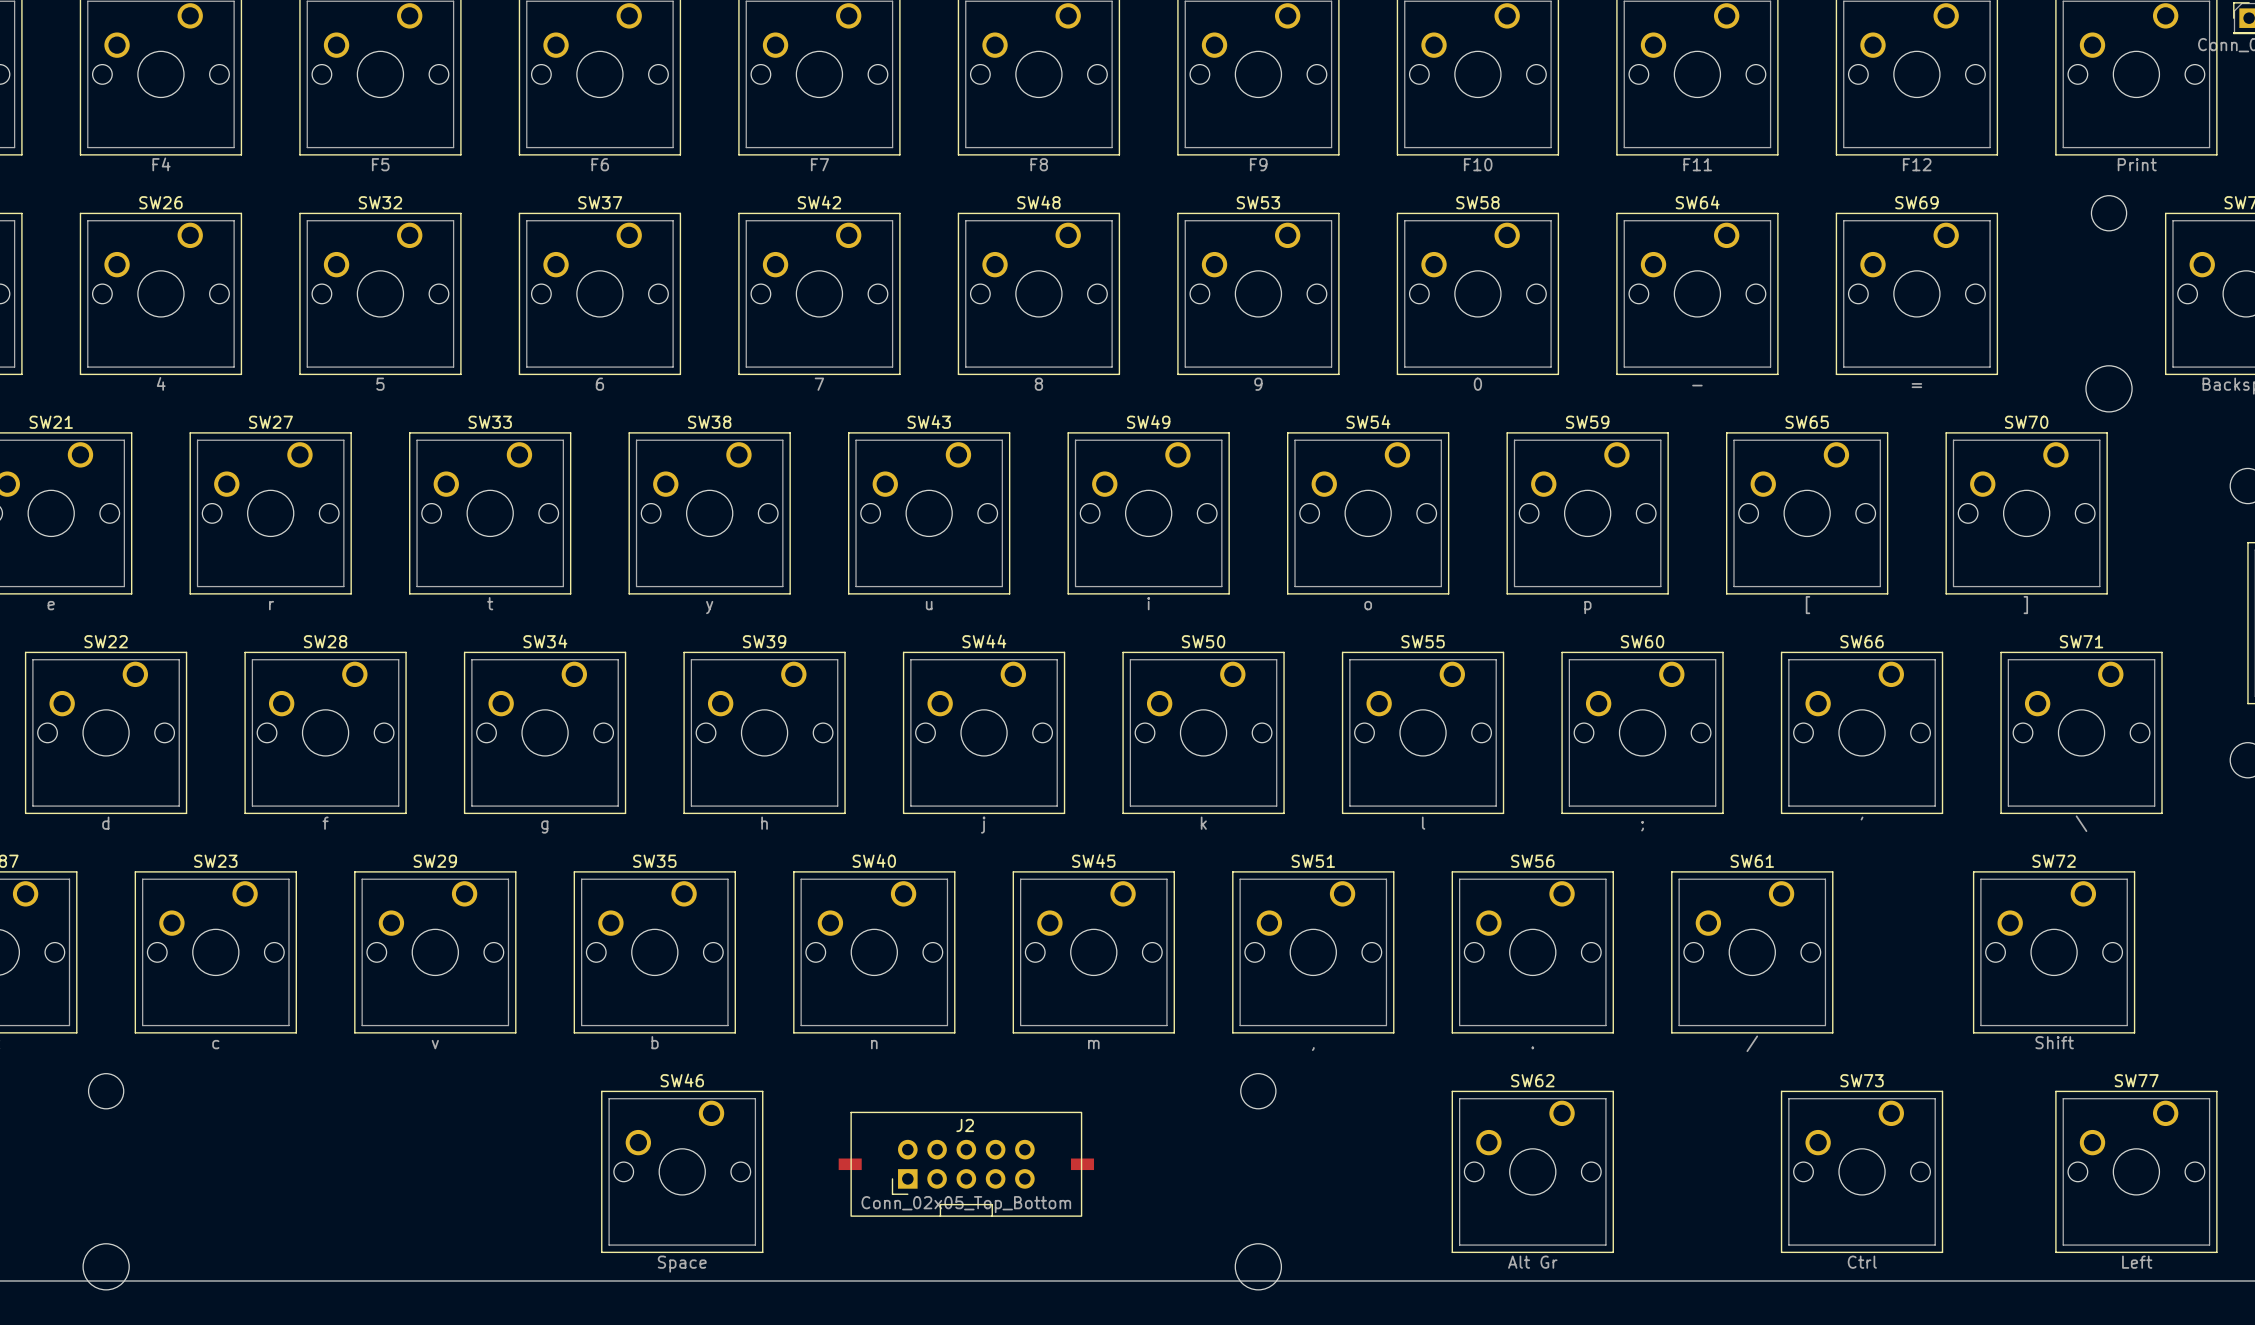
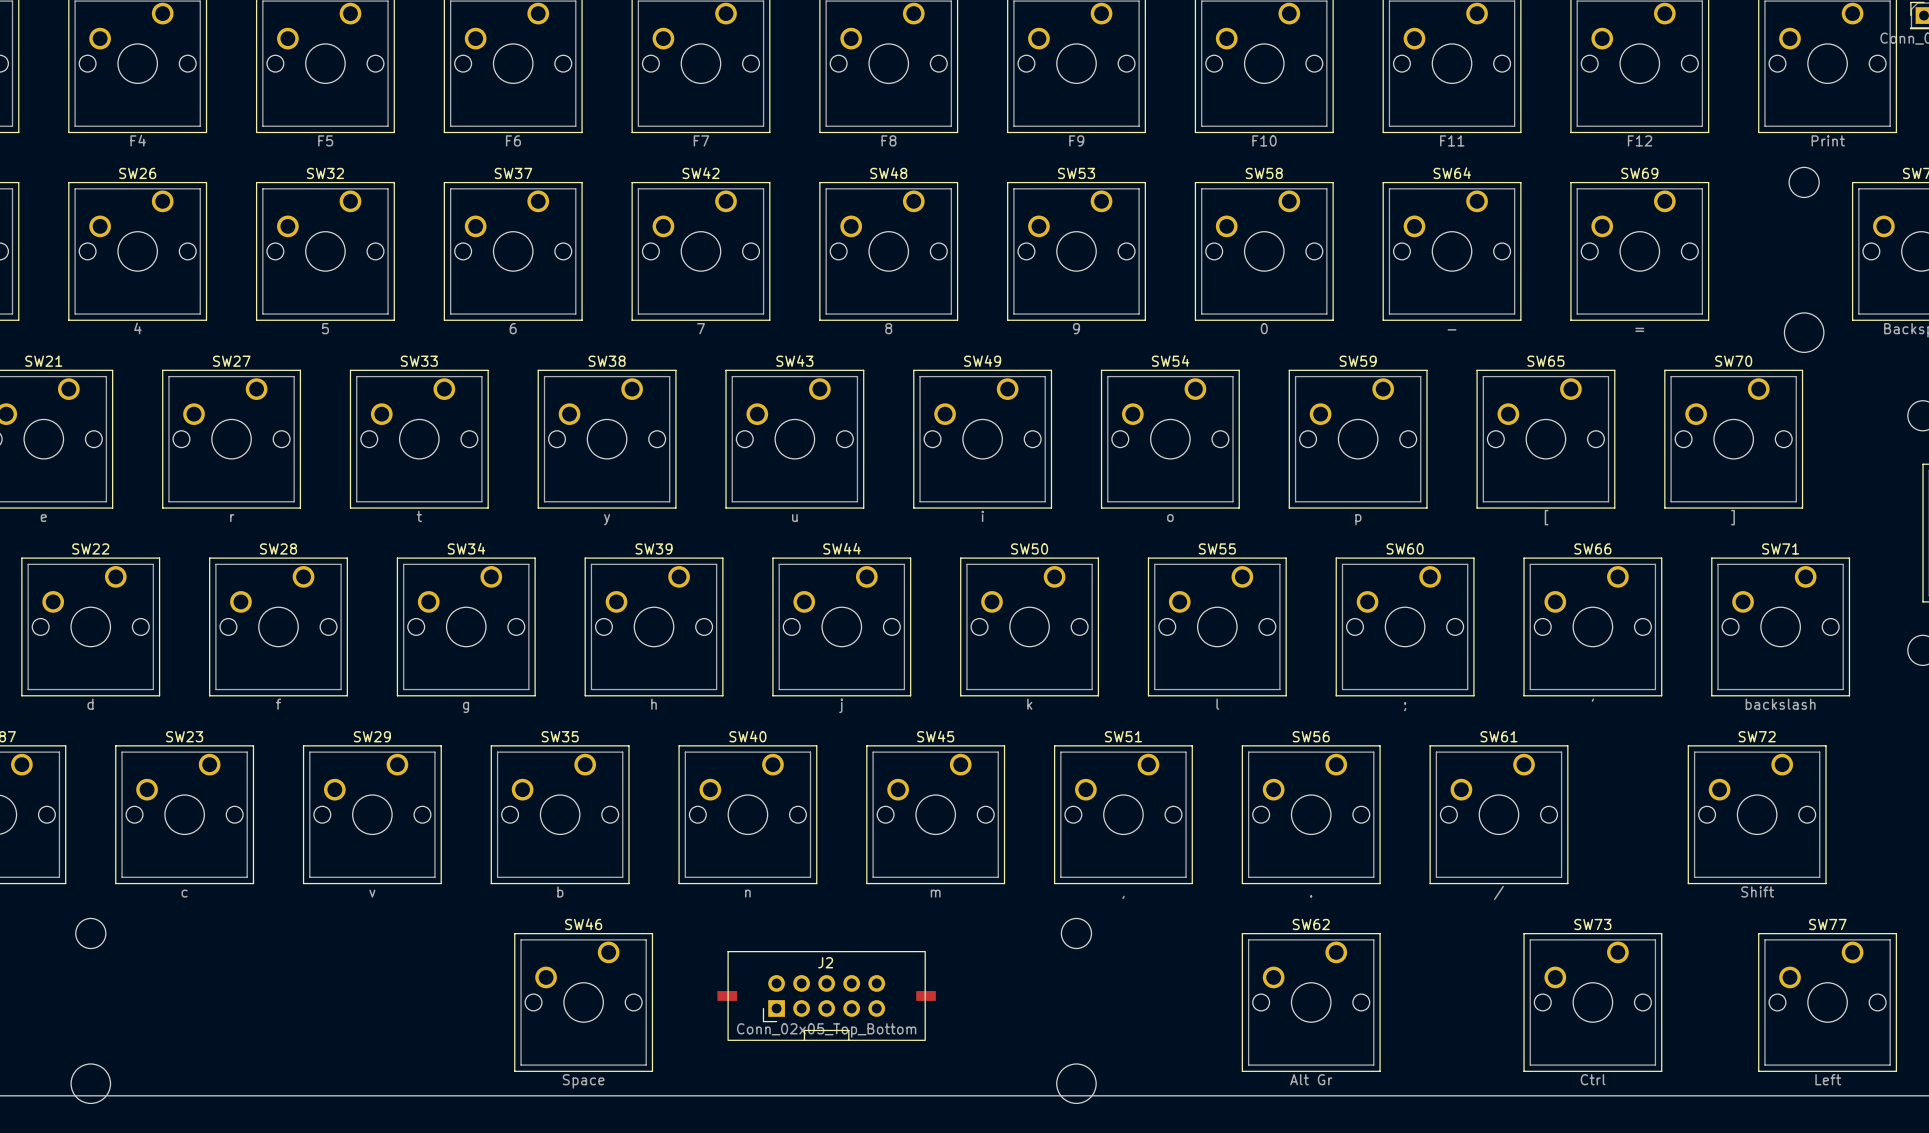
SW71 value: \ (2081, 823) -> backslash (1780, 704)

